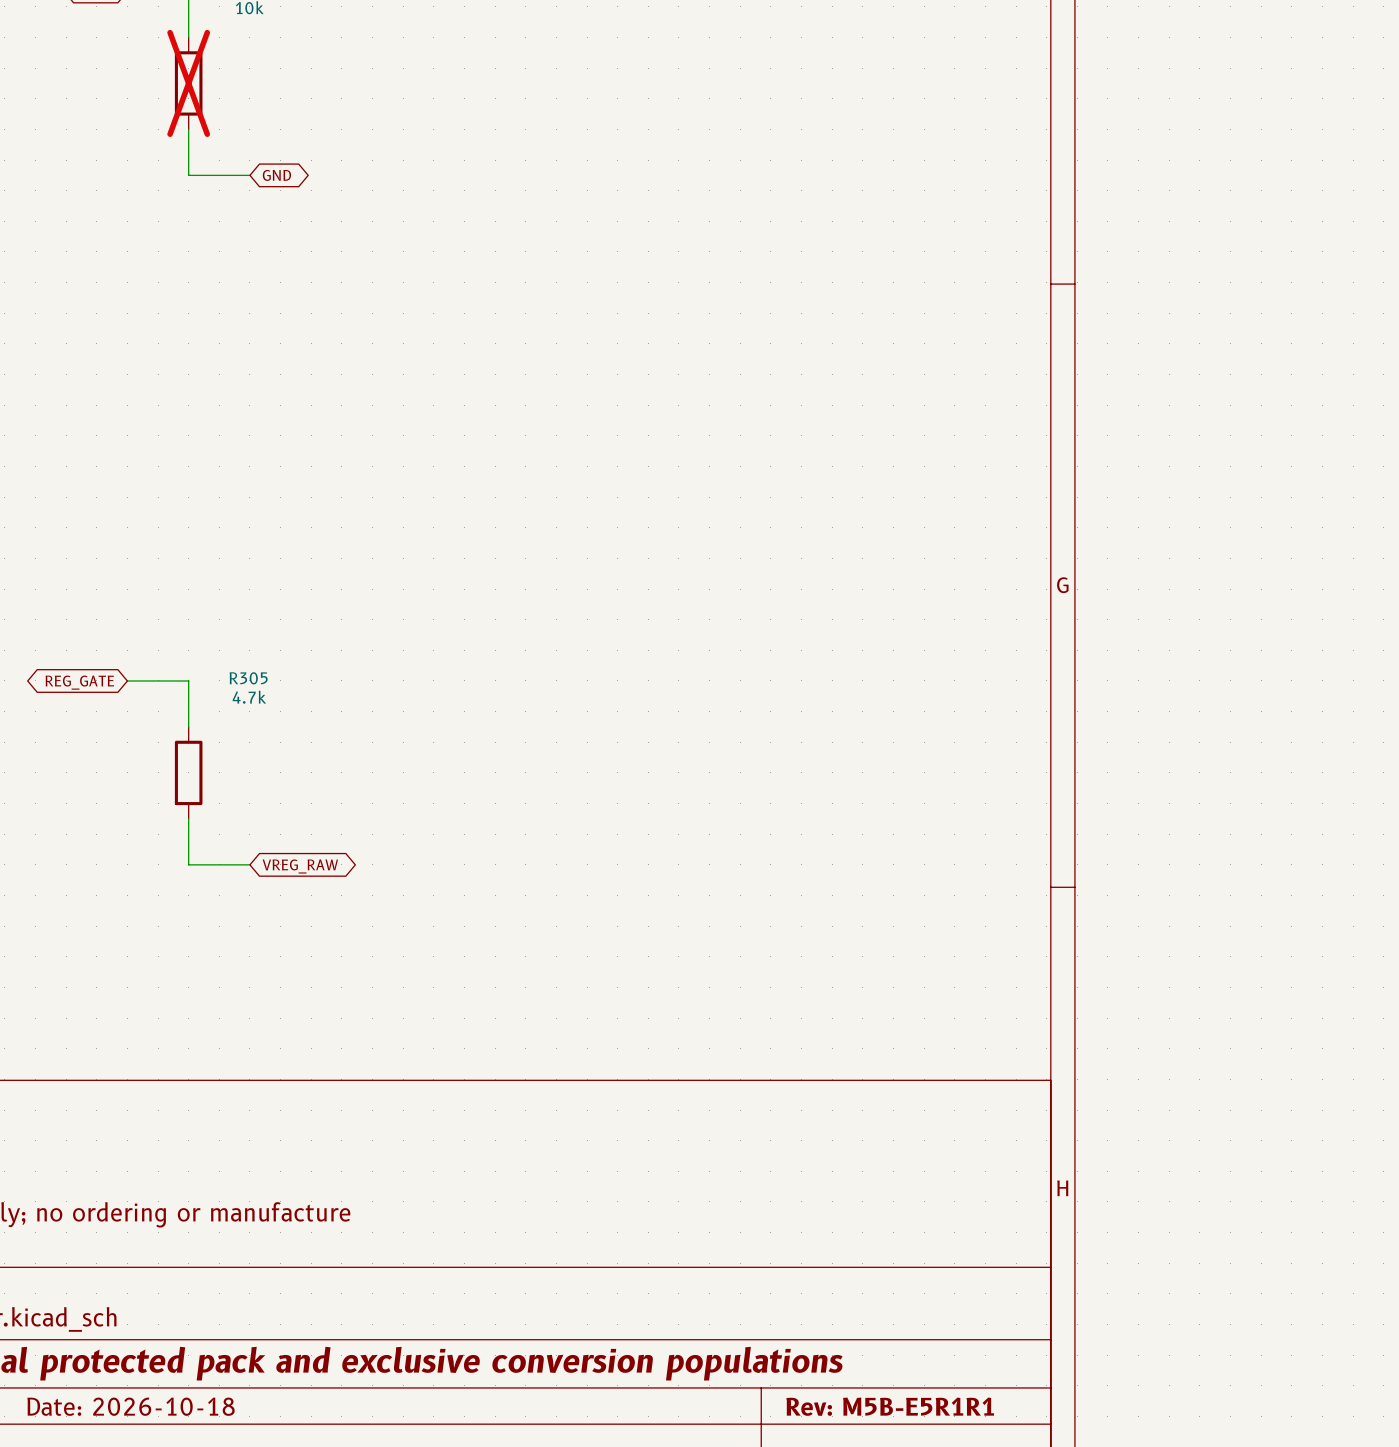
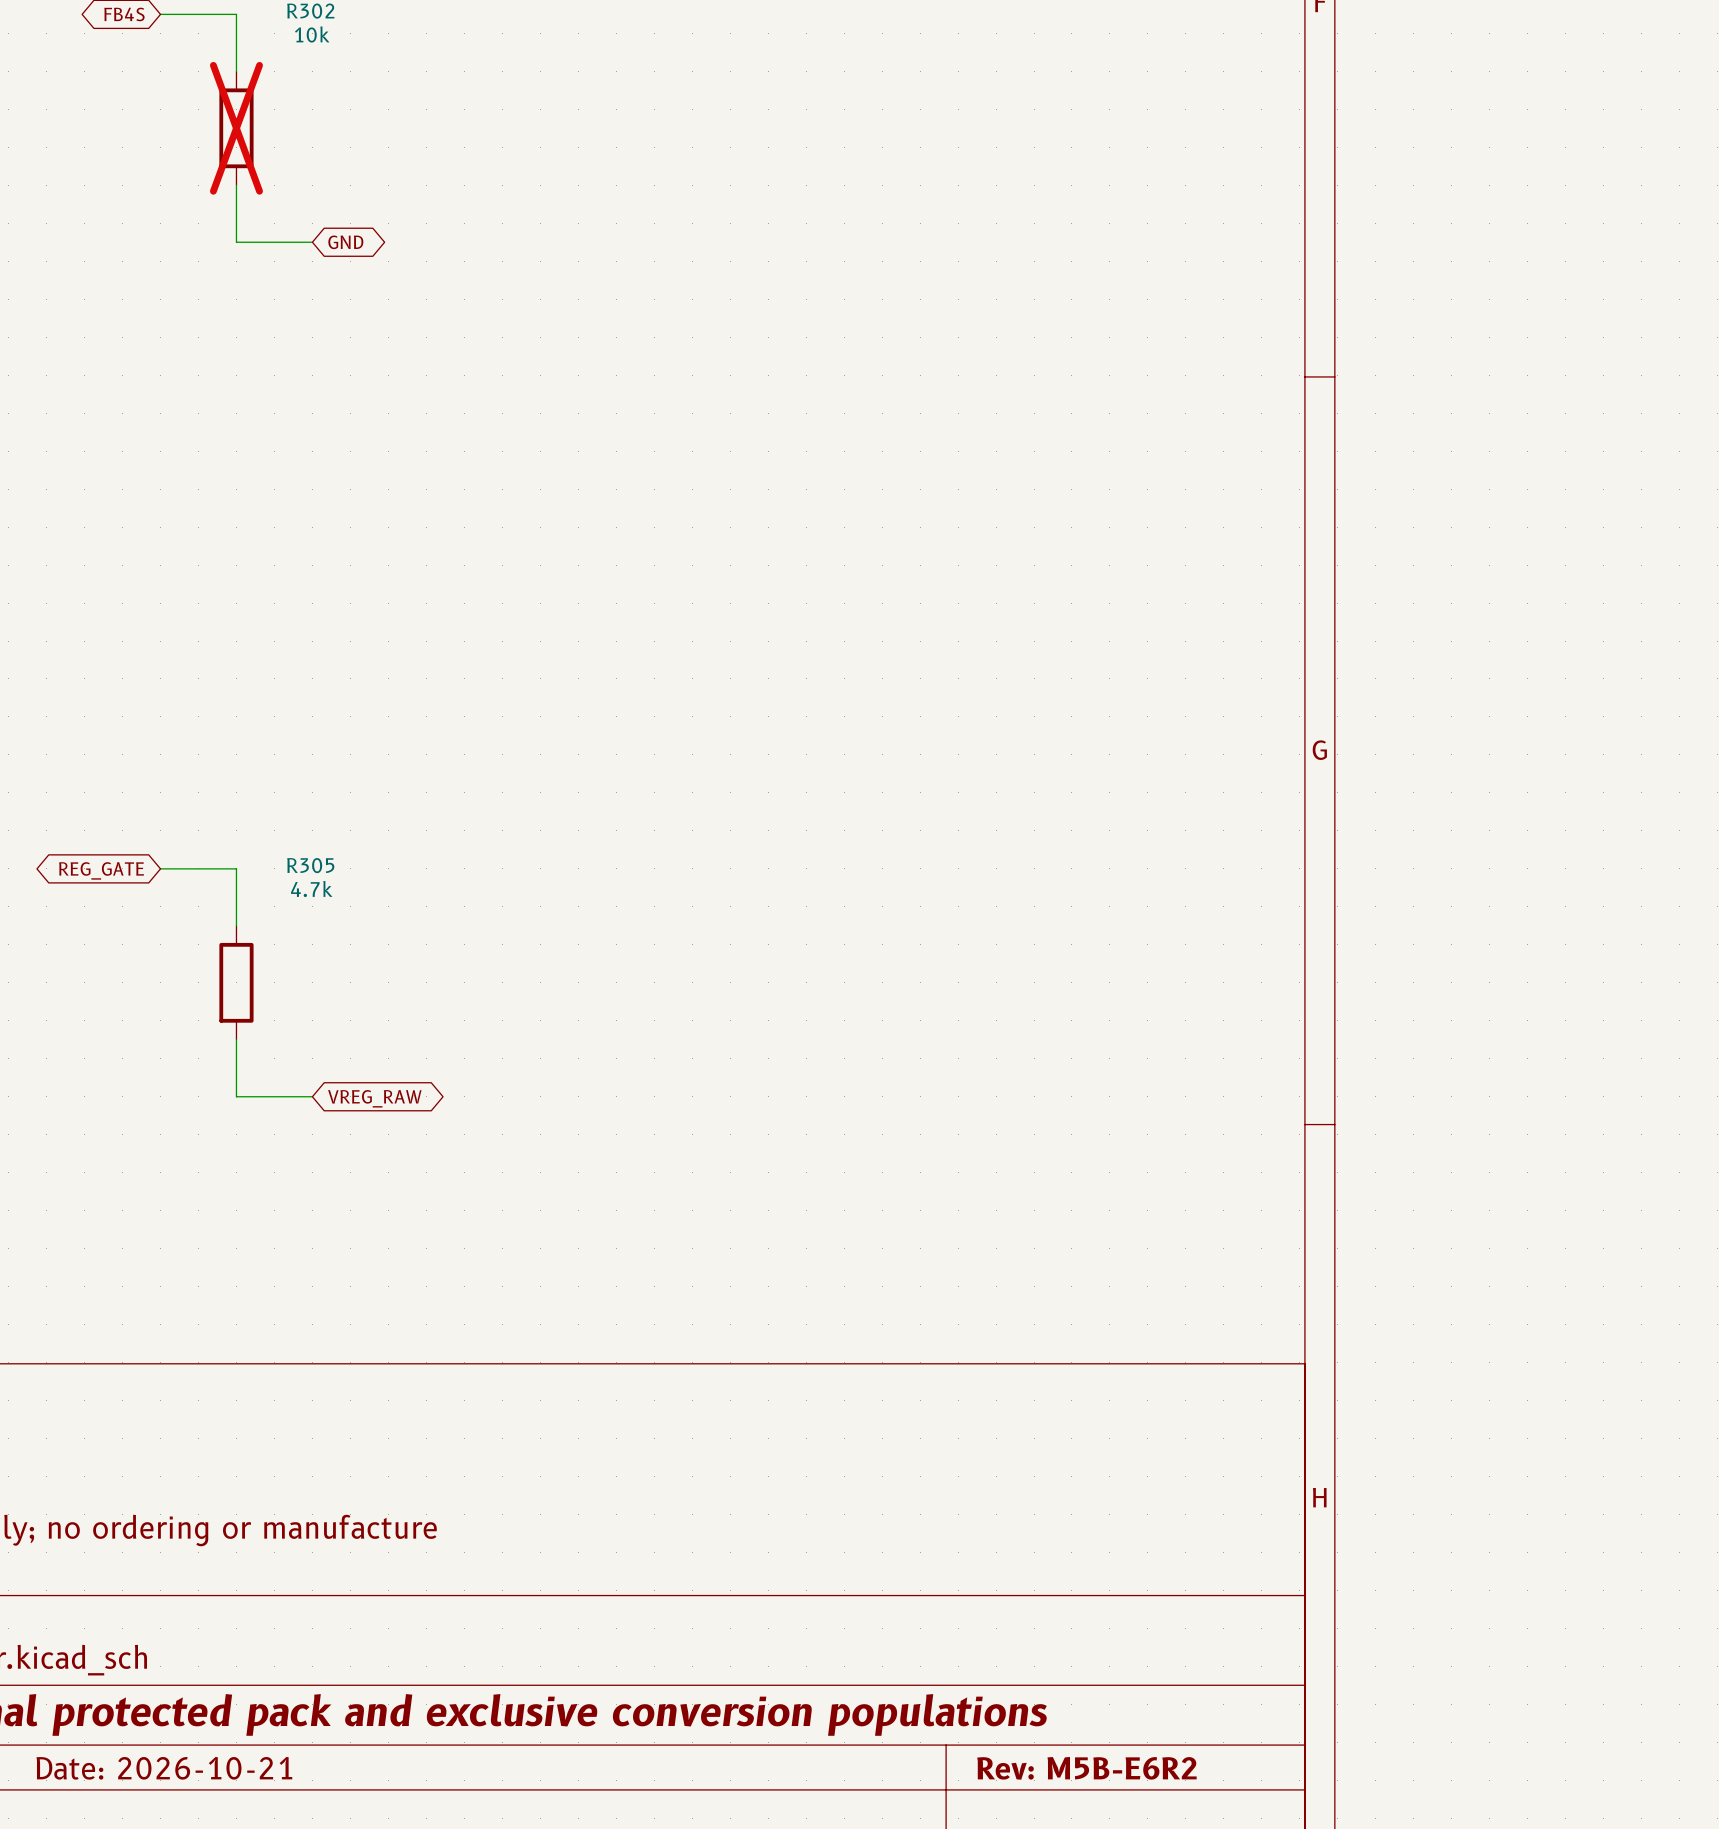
title block: Date: 2026-10-18 (130, 1406) -> Date: 2026-10-21 (164, 1768)
title block: Rev: M5B-E5R1R1 (890, 1406) -> Rev: M5B-E6R2 (1086, 1768)

